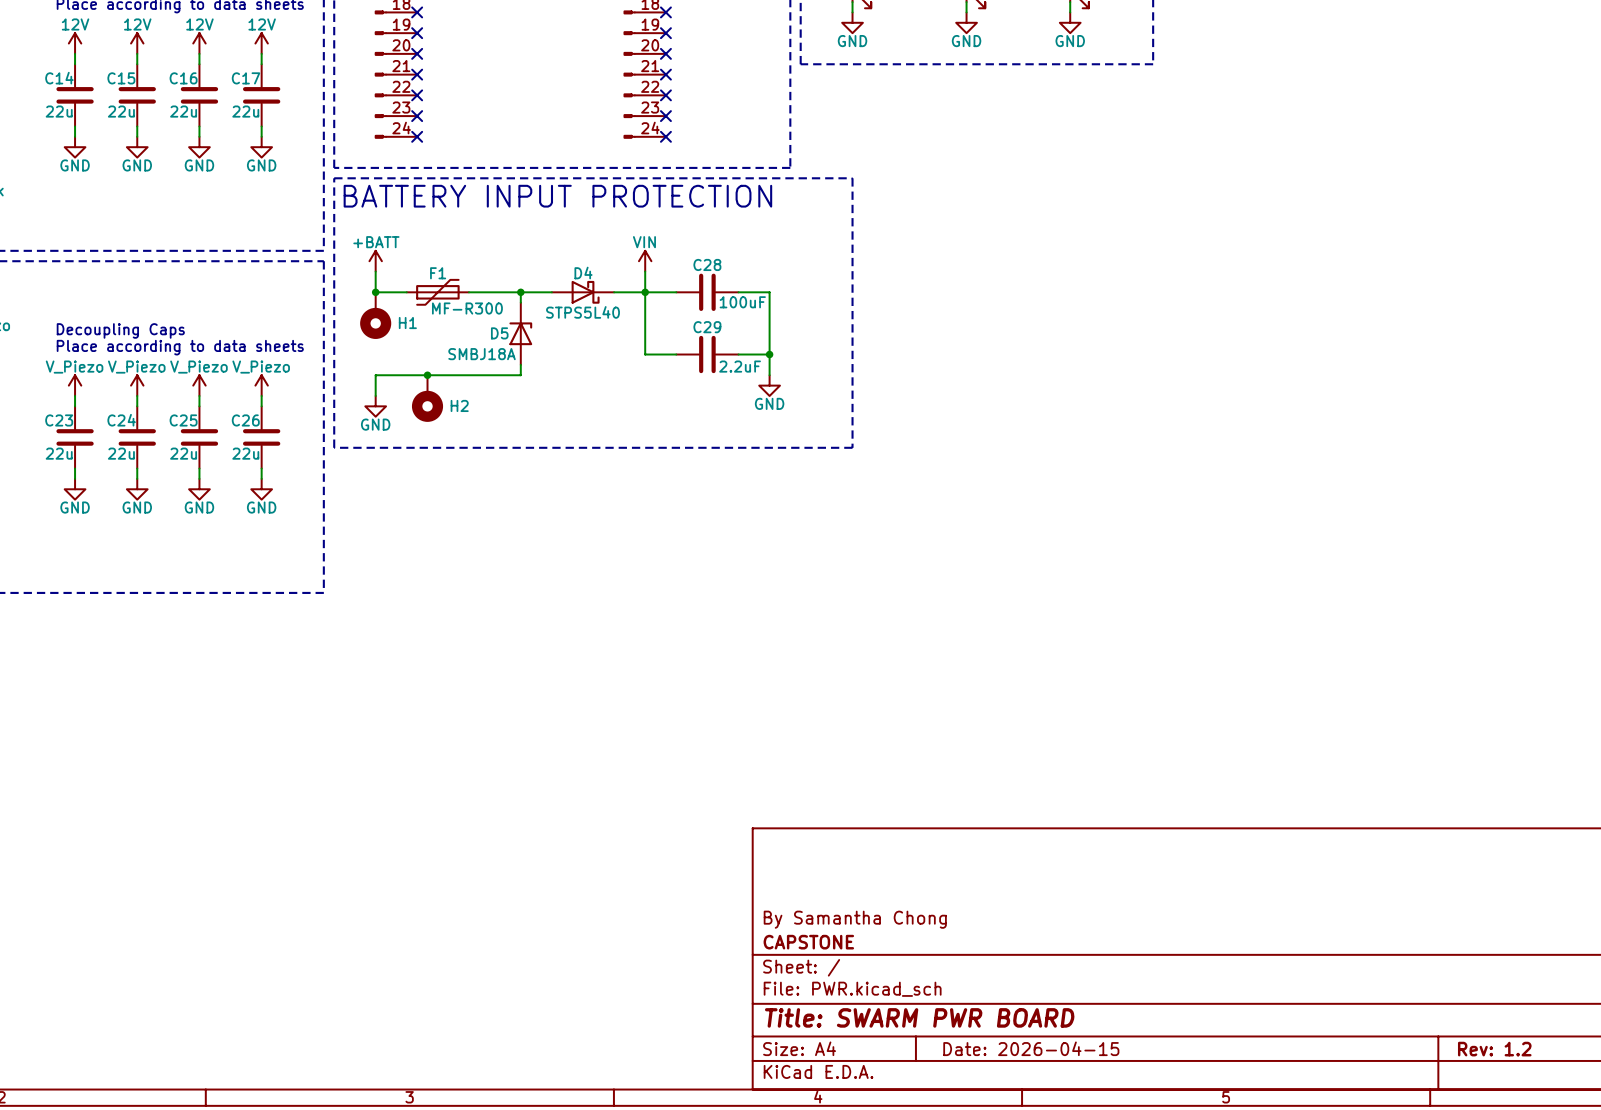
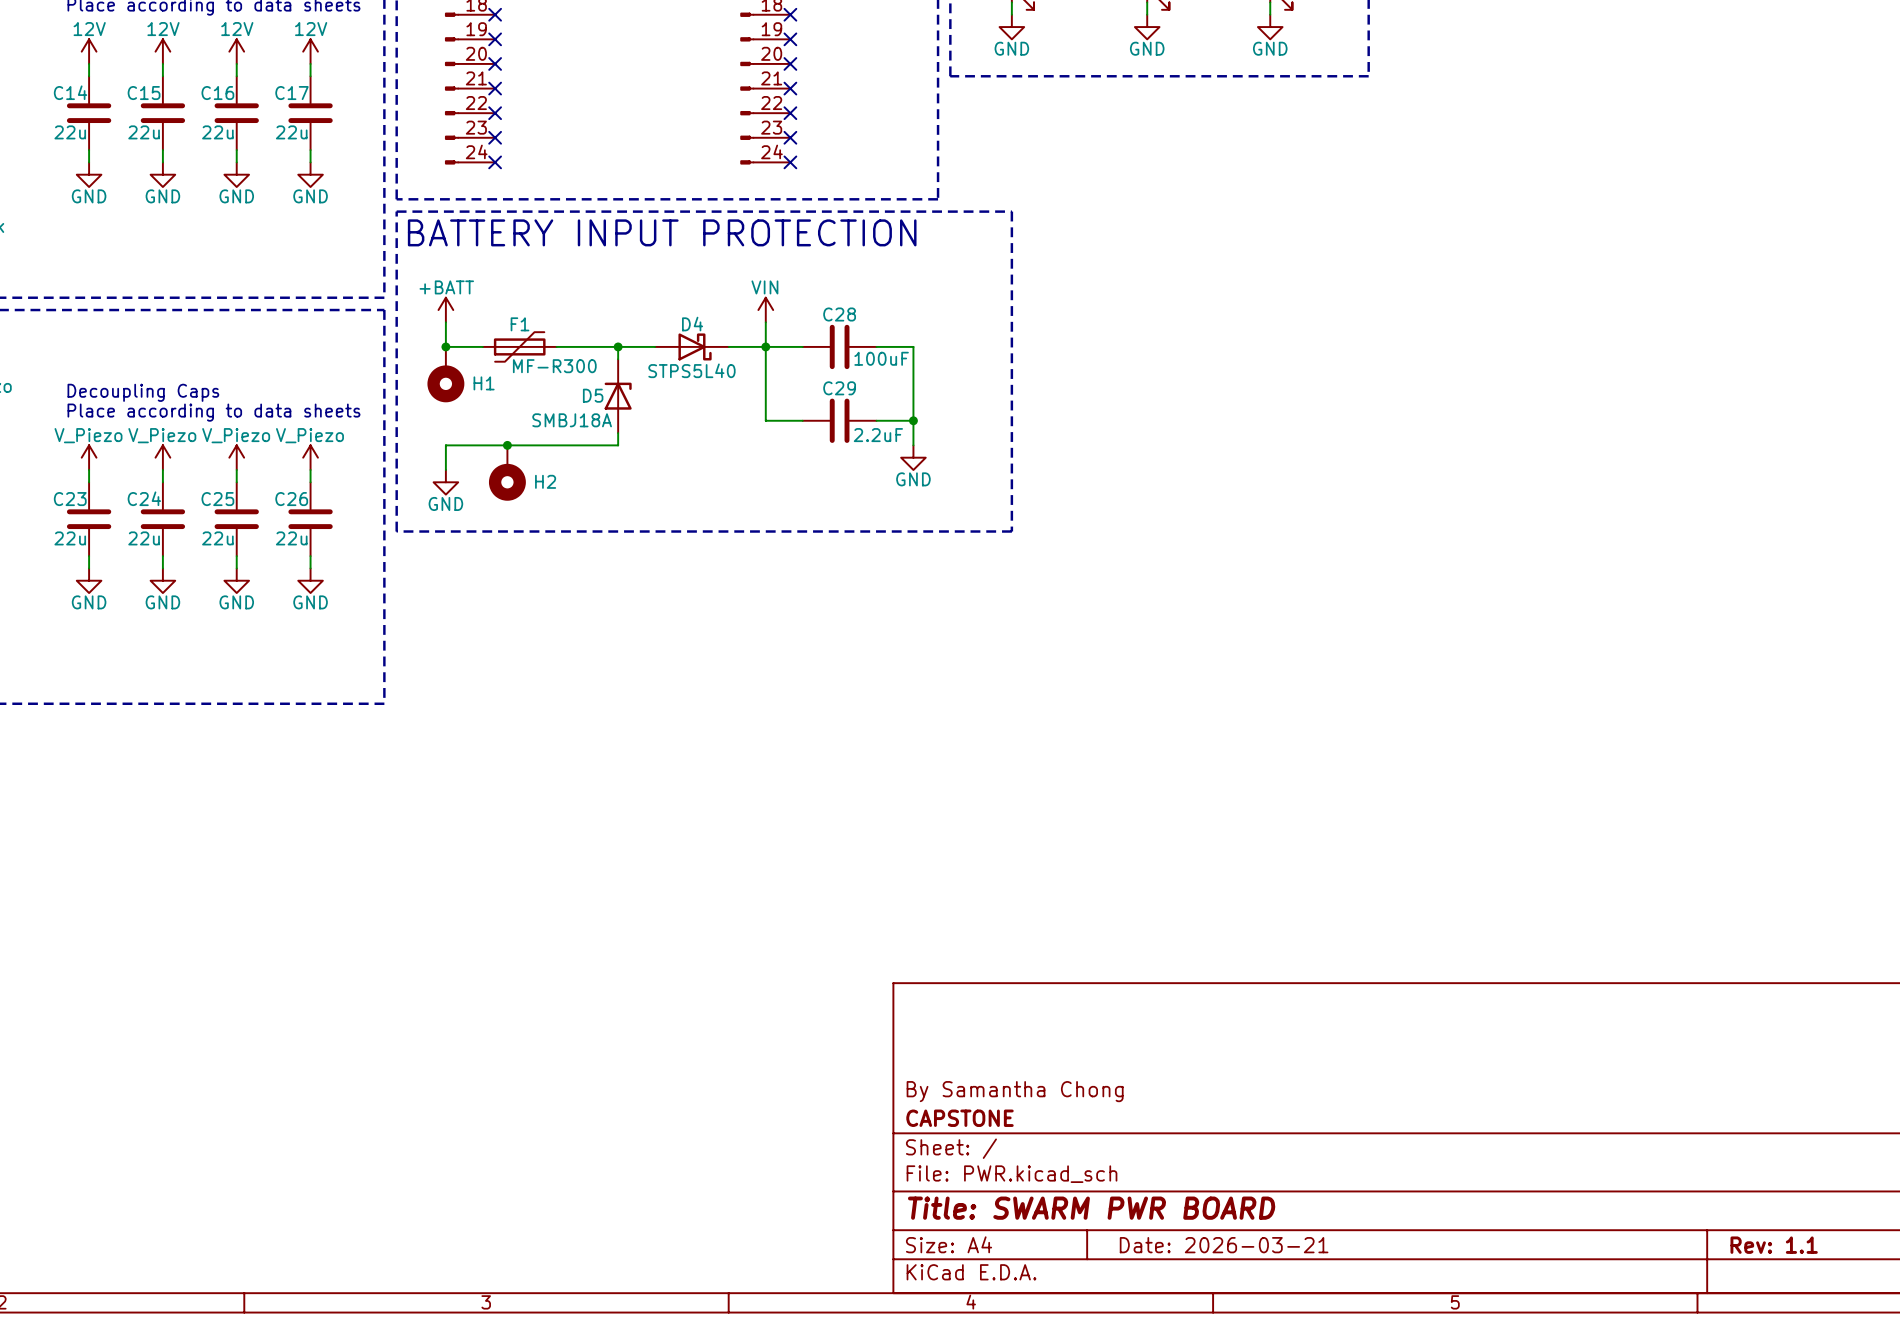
title block: Date: 2026-04-15 (1031, 1048) -> Date: 2026-03-21 (1224, 1245)
title block: Rev: 1.2 (1494, 1049) -> Rev: 1.1 (1774, 1245)

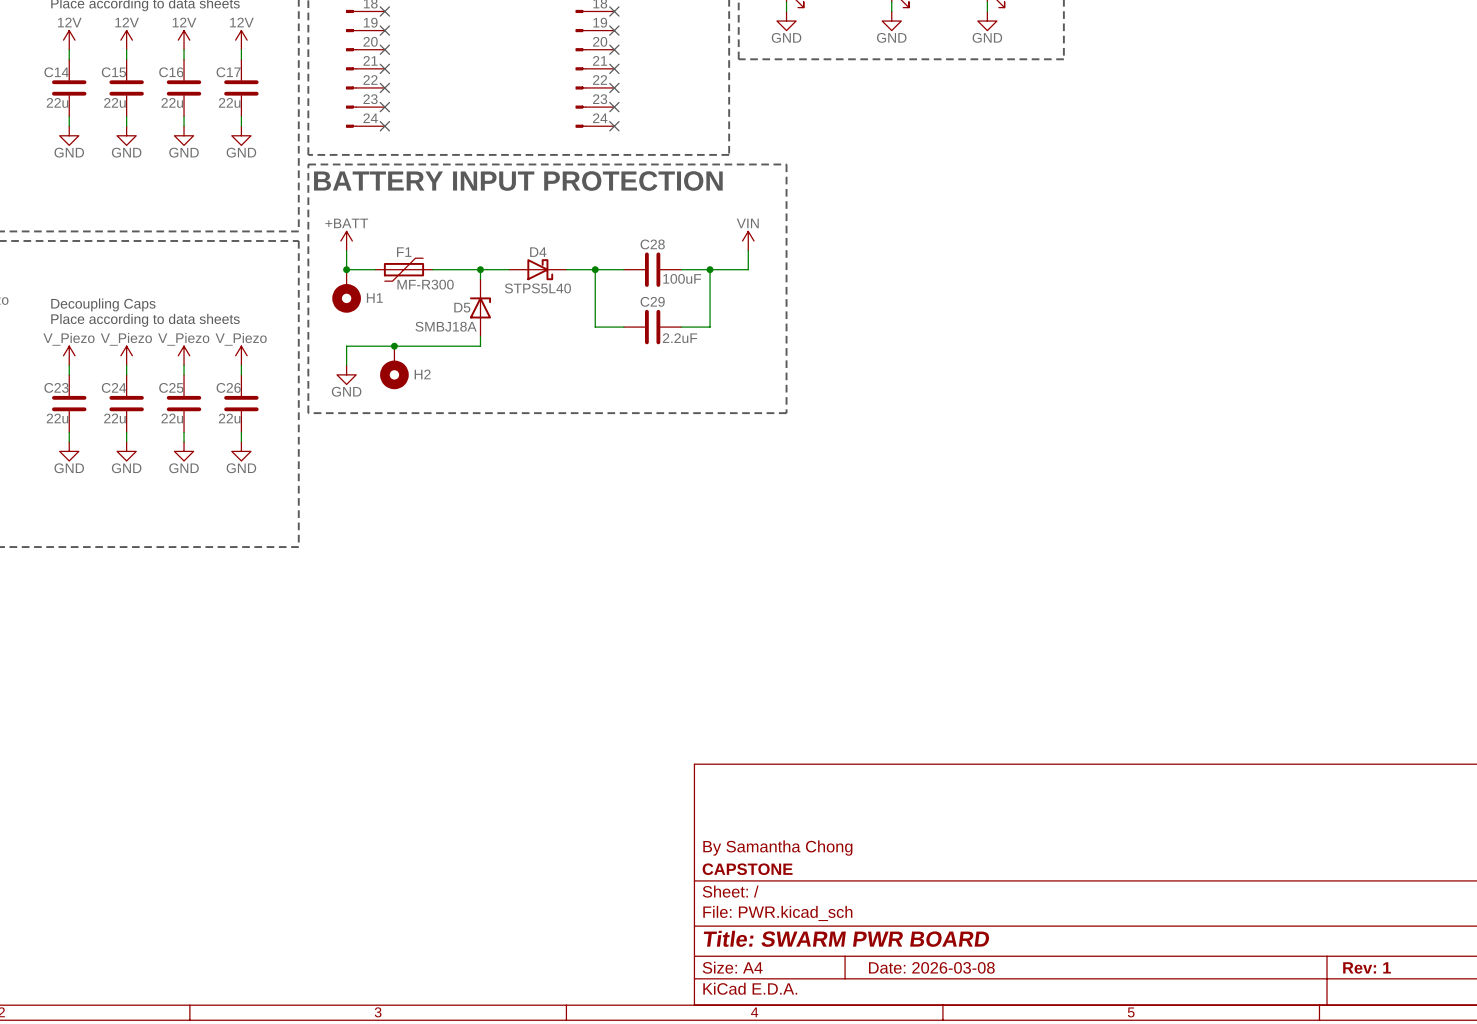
power symbol position: VIN (765, 310) -> VIN (748, 240)
wire: (765, 322) (765, 346) -> none
wire: none -> (748, 250) (748, 269) (710, 269)
junction: none -> (710, 269)
wire: (913, 420) (913, 445) -> none
junction: (913, 420) -> none
power symbol: GND (913, 457) -> none
title block: Date: 2026-03-21 (1224, 1245) -> Date: 2026-03-08 (931, 967)
title block: Rev: 1.1 (1774, 1245) -> Rev: 1 (1367, 967)

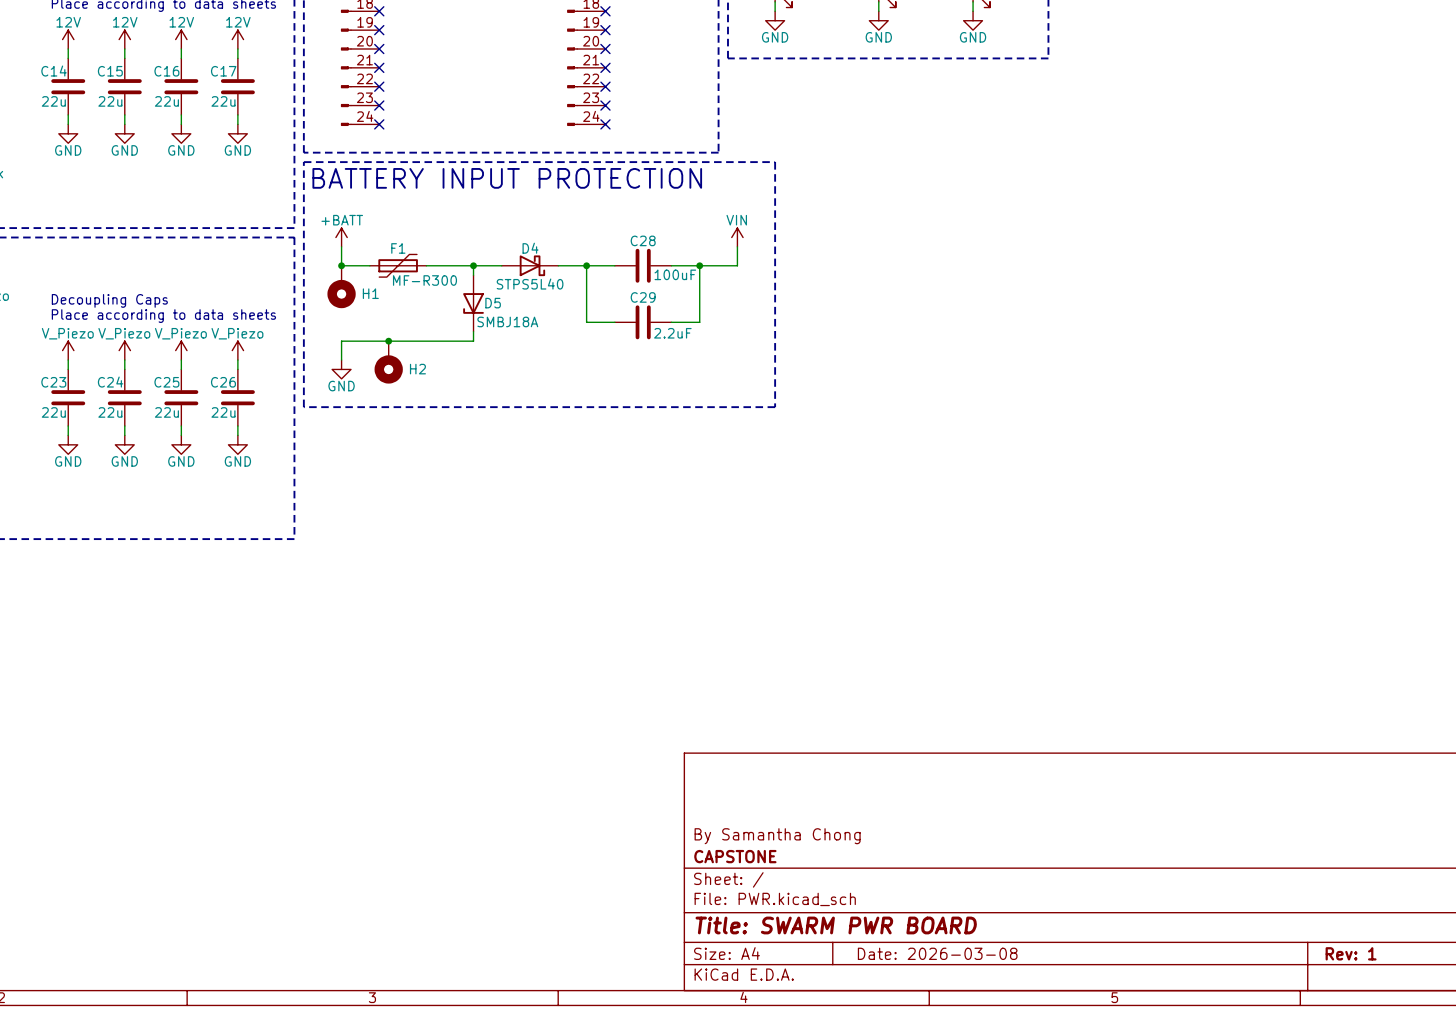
D5 rotation: 0° (480, 307) -> 180° (473, 303)
D5 value position: SMBJ18A (446, 326) -> SMBJ18A (507, 321)

